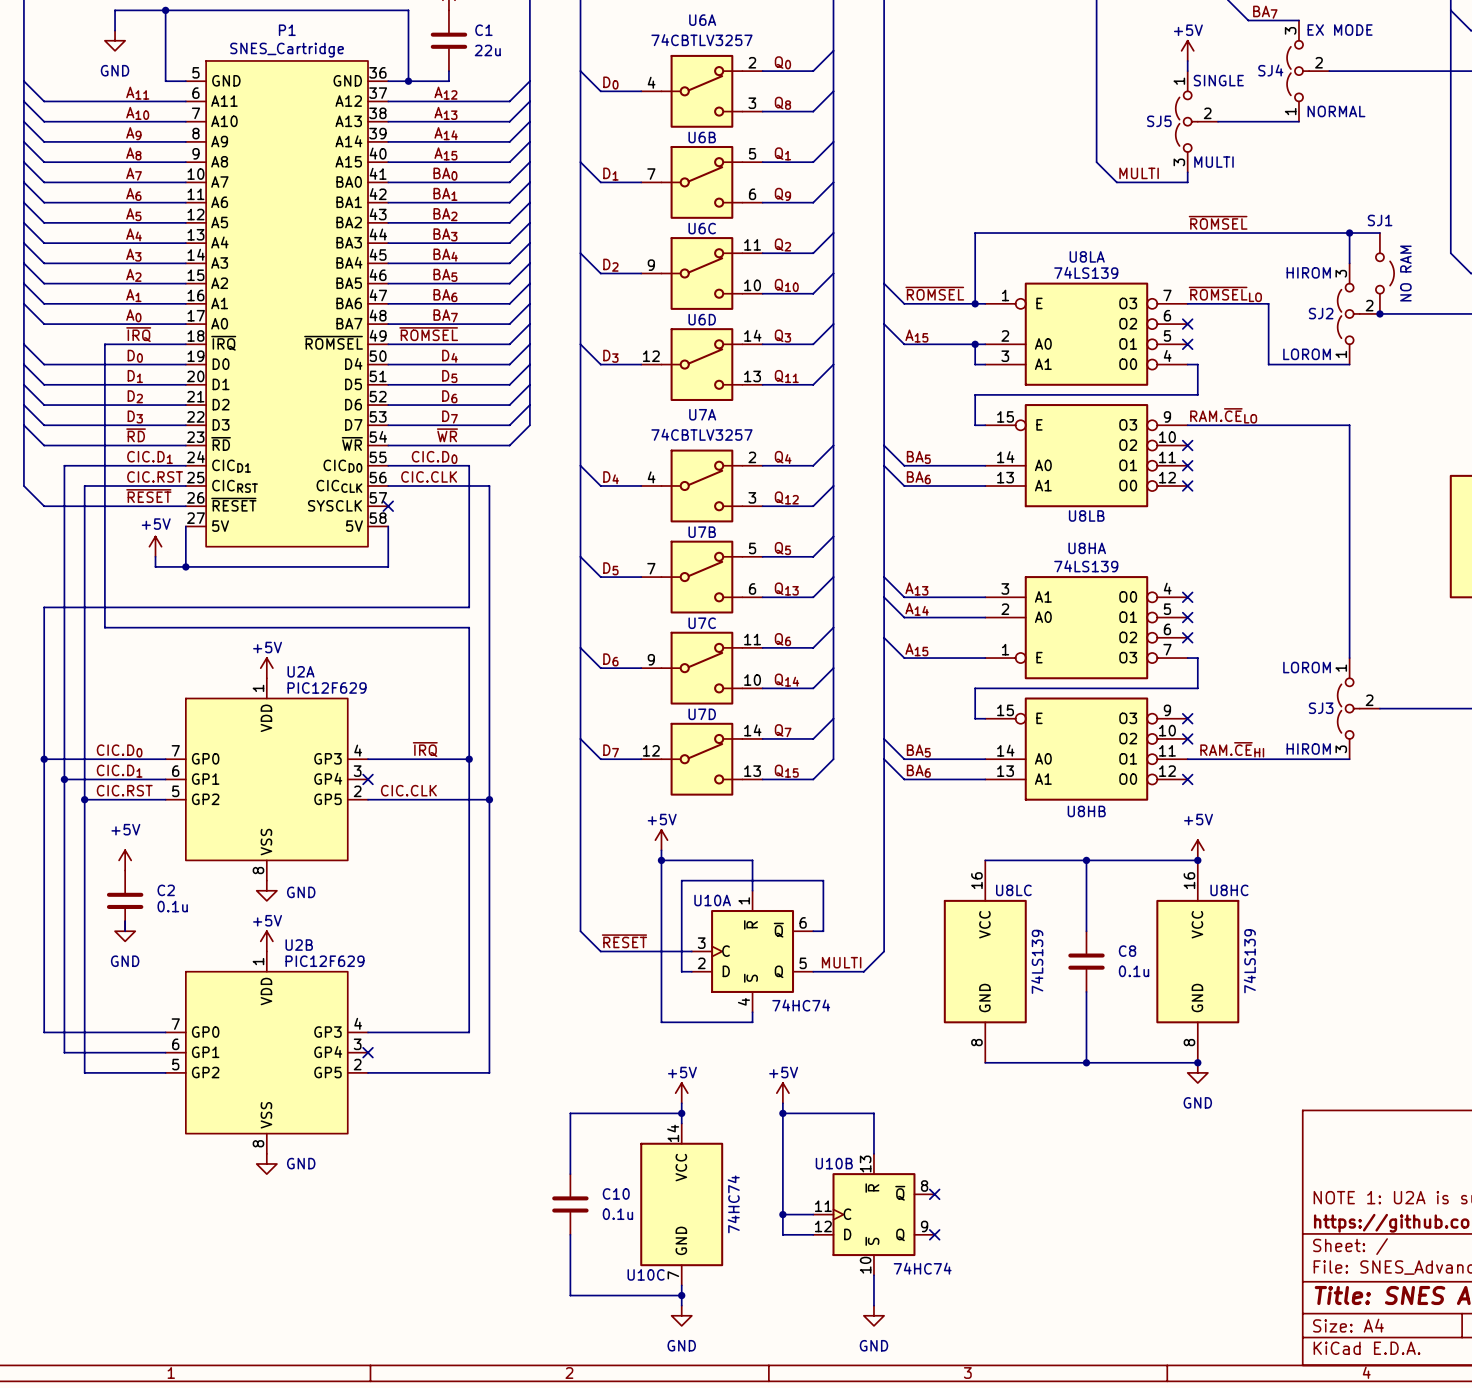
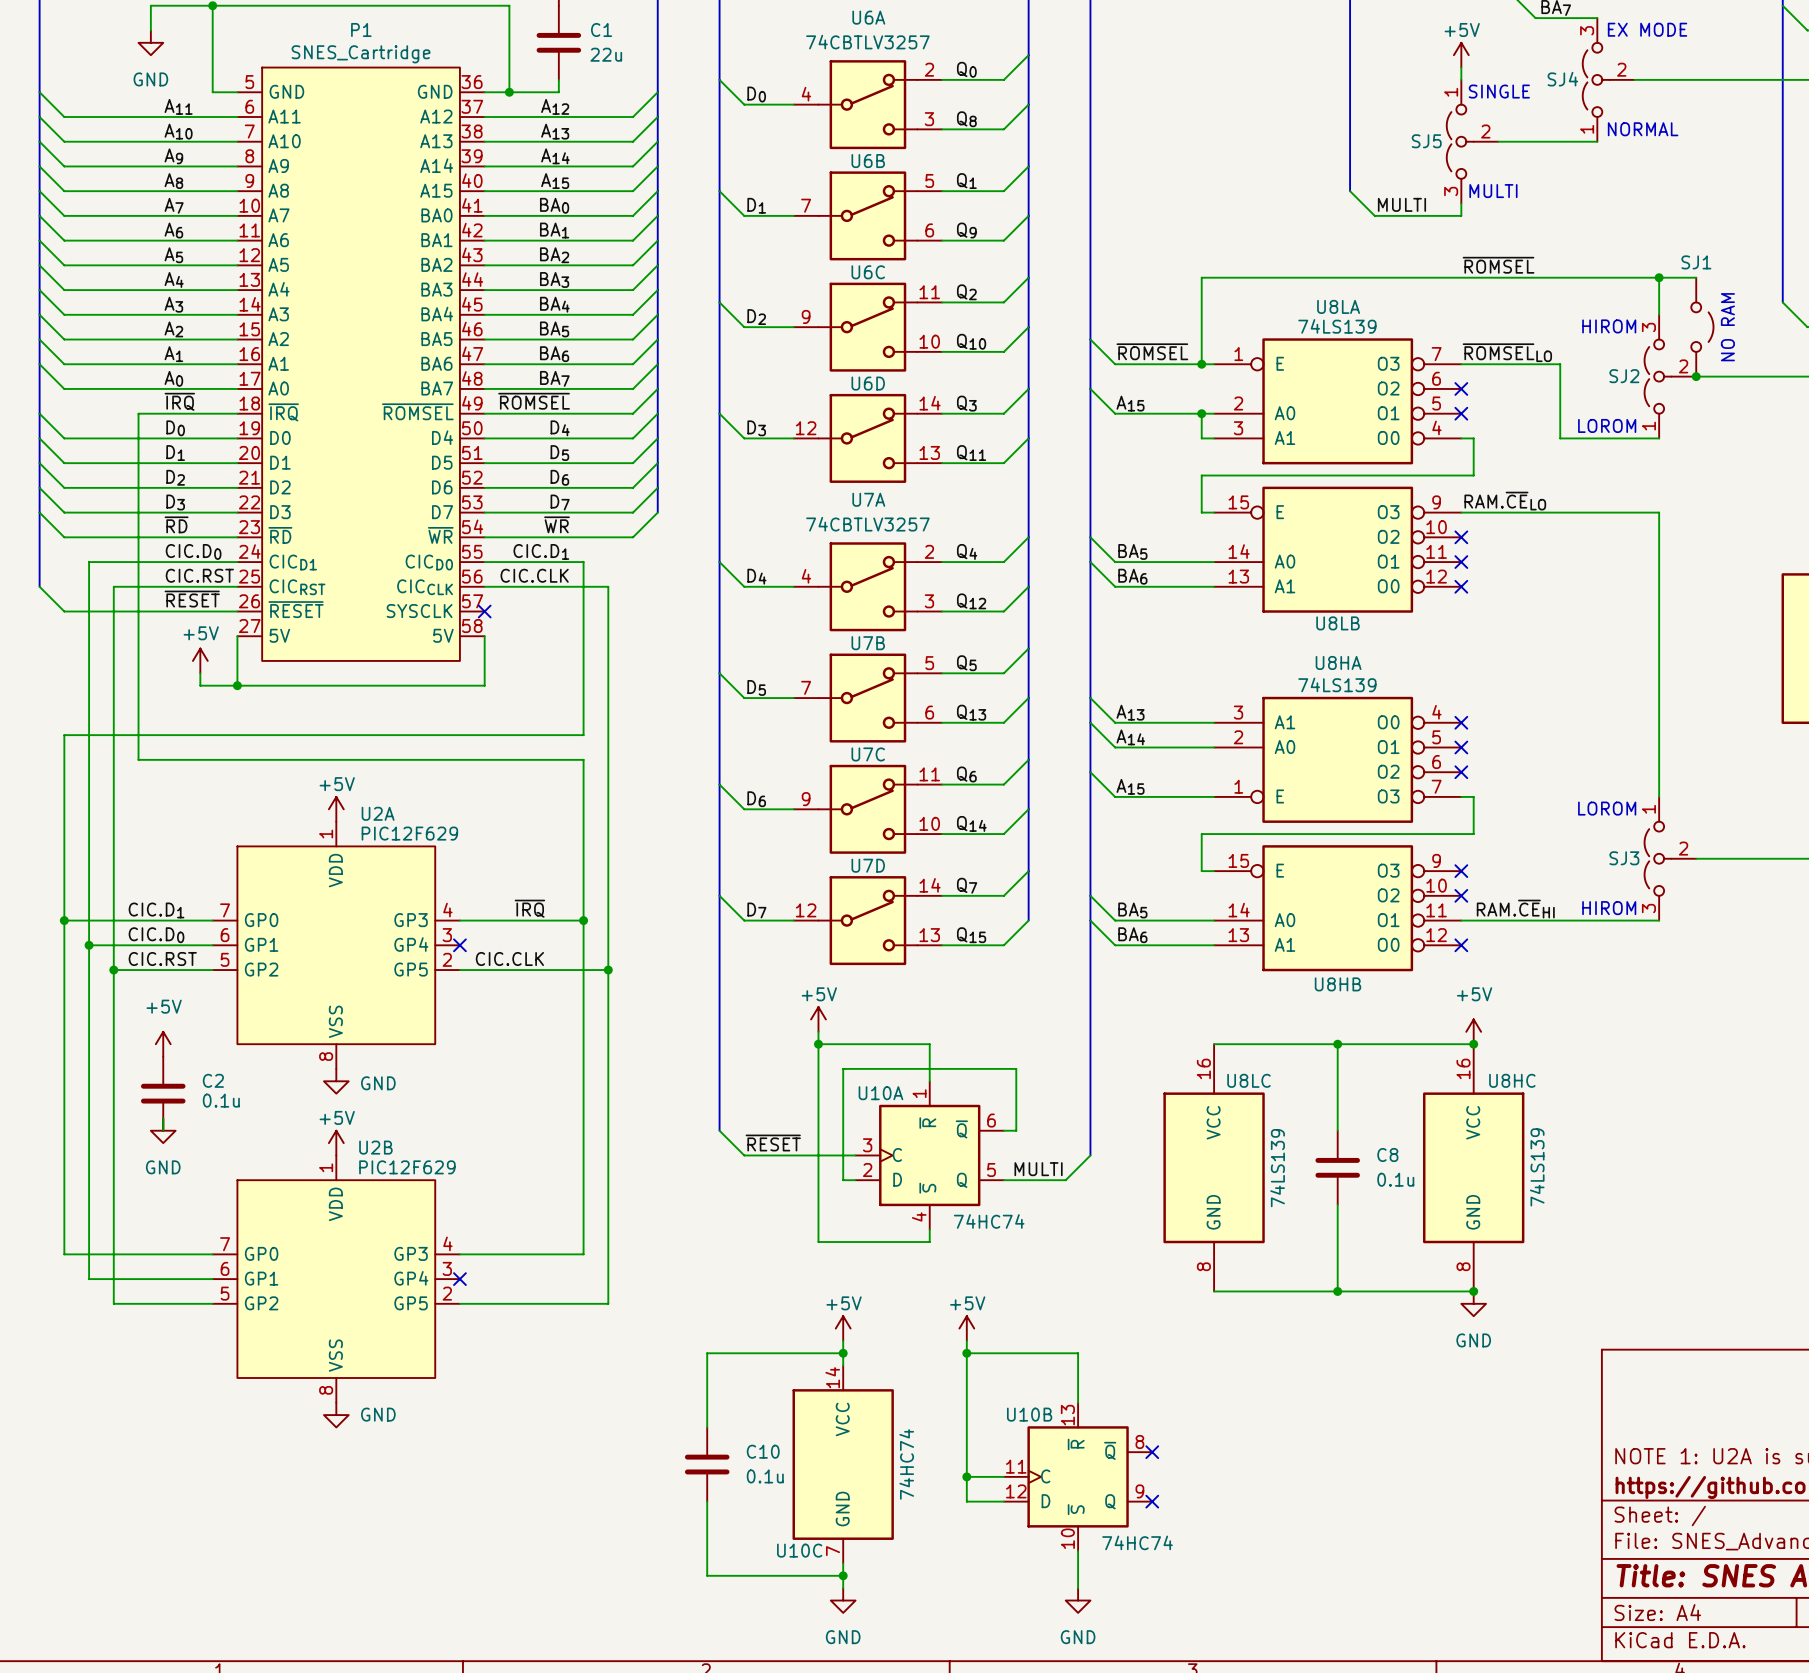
label: CIC.D1 (149, 457) -> CIC.D0 (193, 551)
label: CIC.D0 (434, 457) -> CIC.D1 (541, 551)
label: CIC.D0 (119, 750) -> CIC.D1 (156, 910)
label: CIC.D1 (119, 771) -> CIC.D0 (156, 935)

